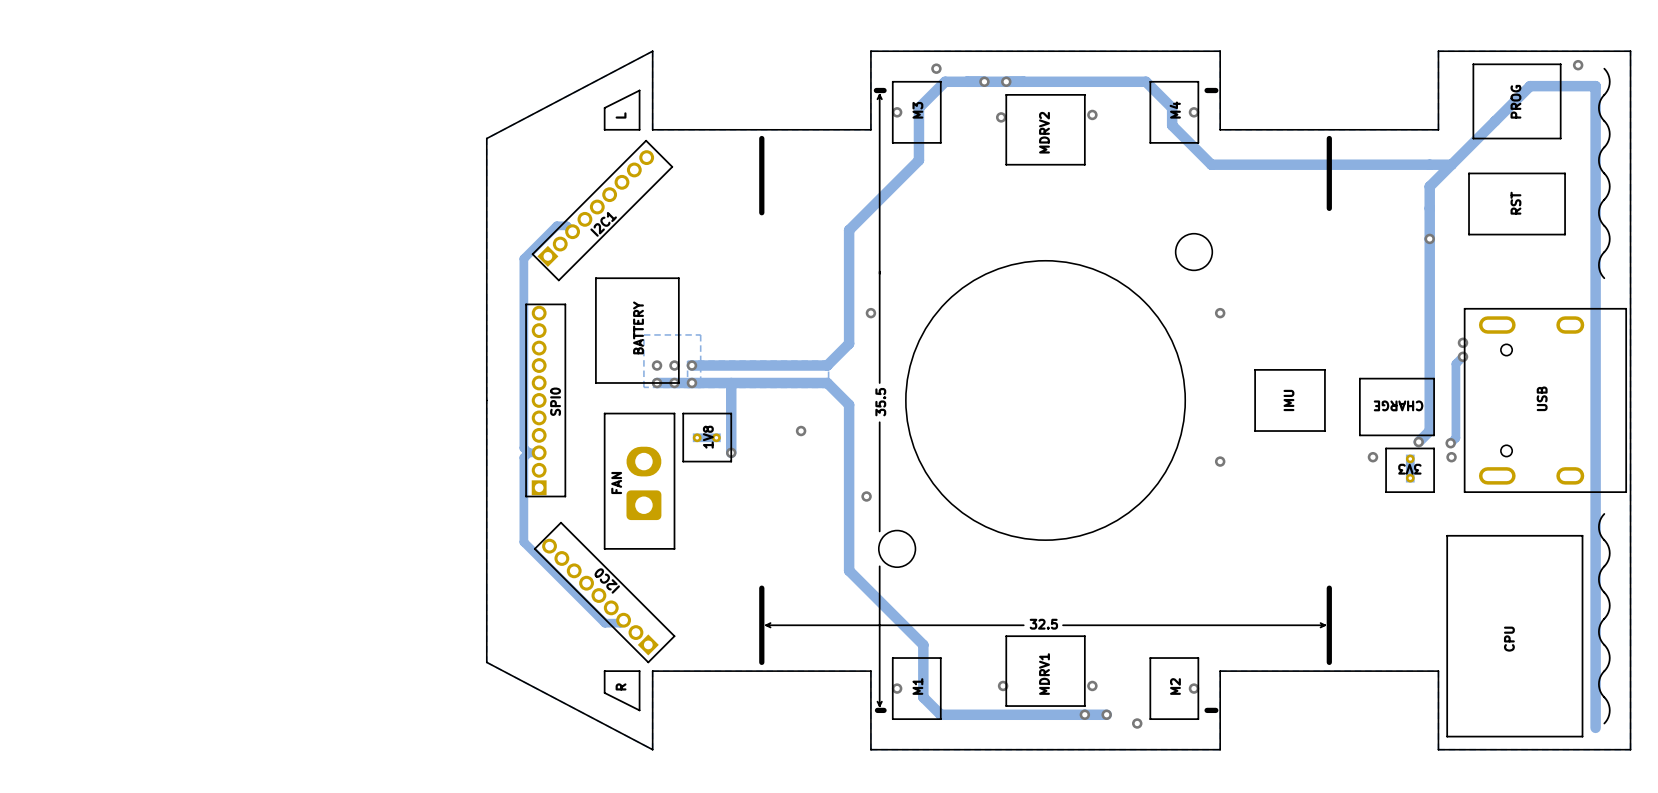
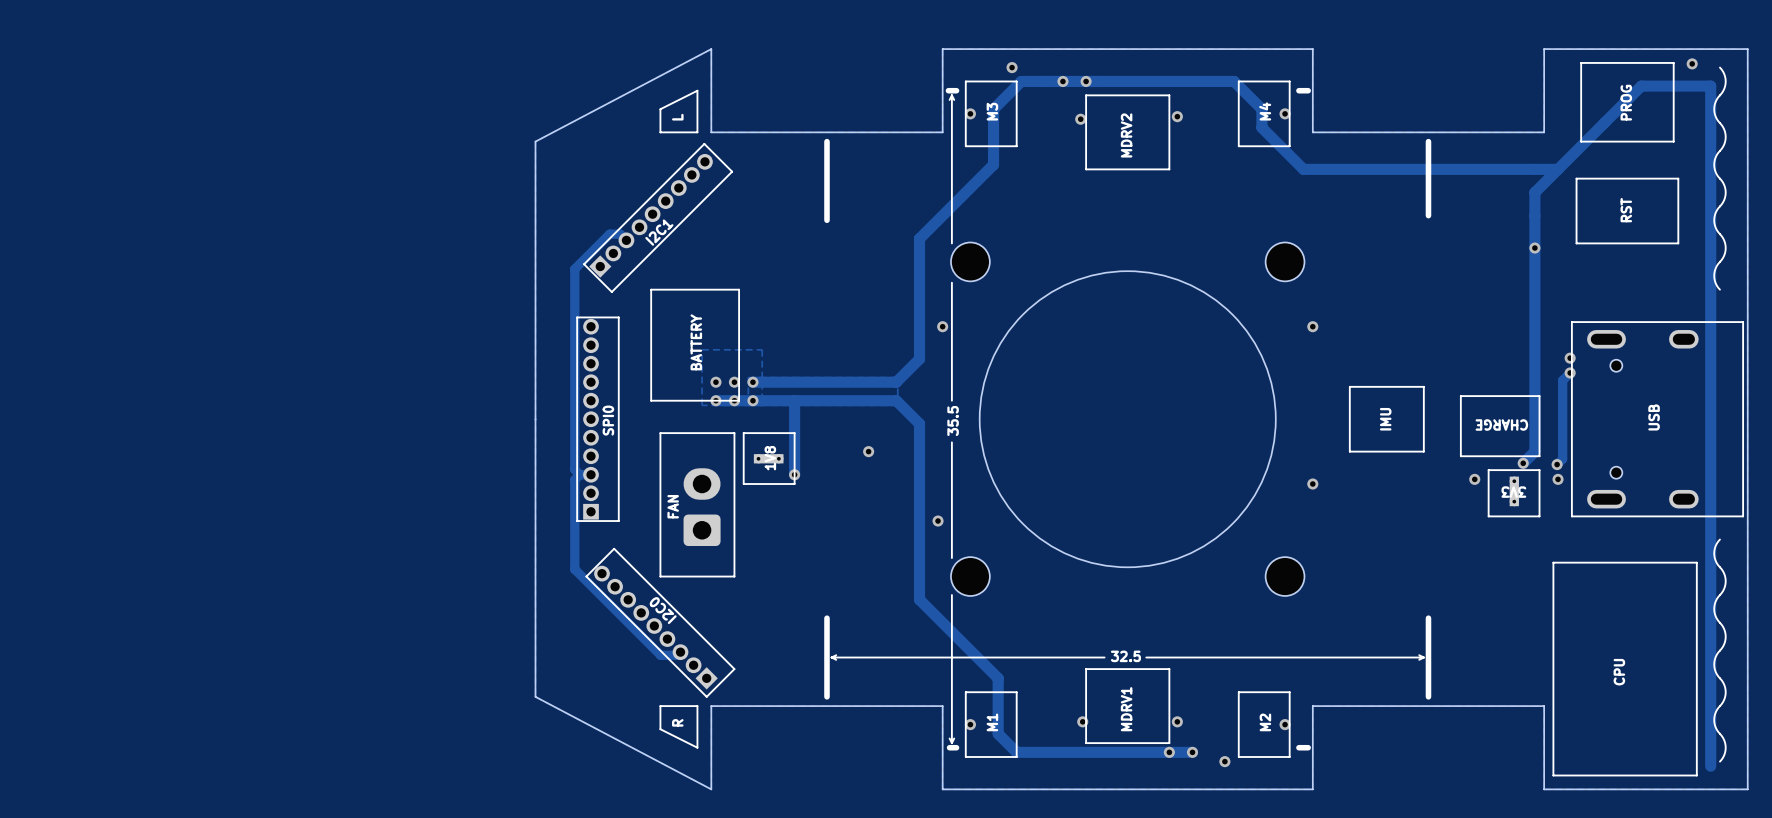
line: (879, 234) (879, 271) -> none
part: none -> (970, 261)
part: none -> (1285, 576)

